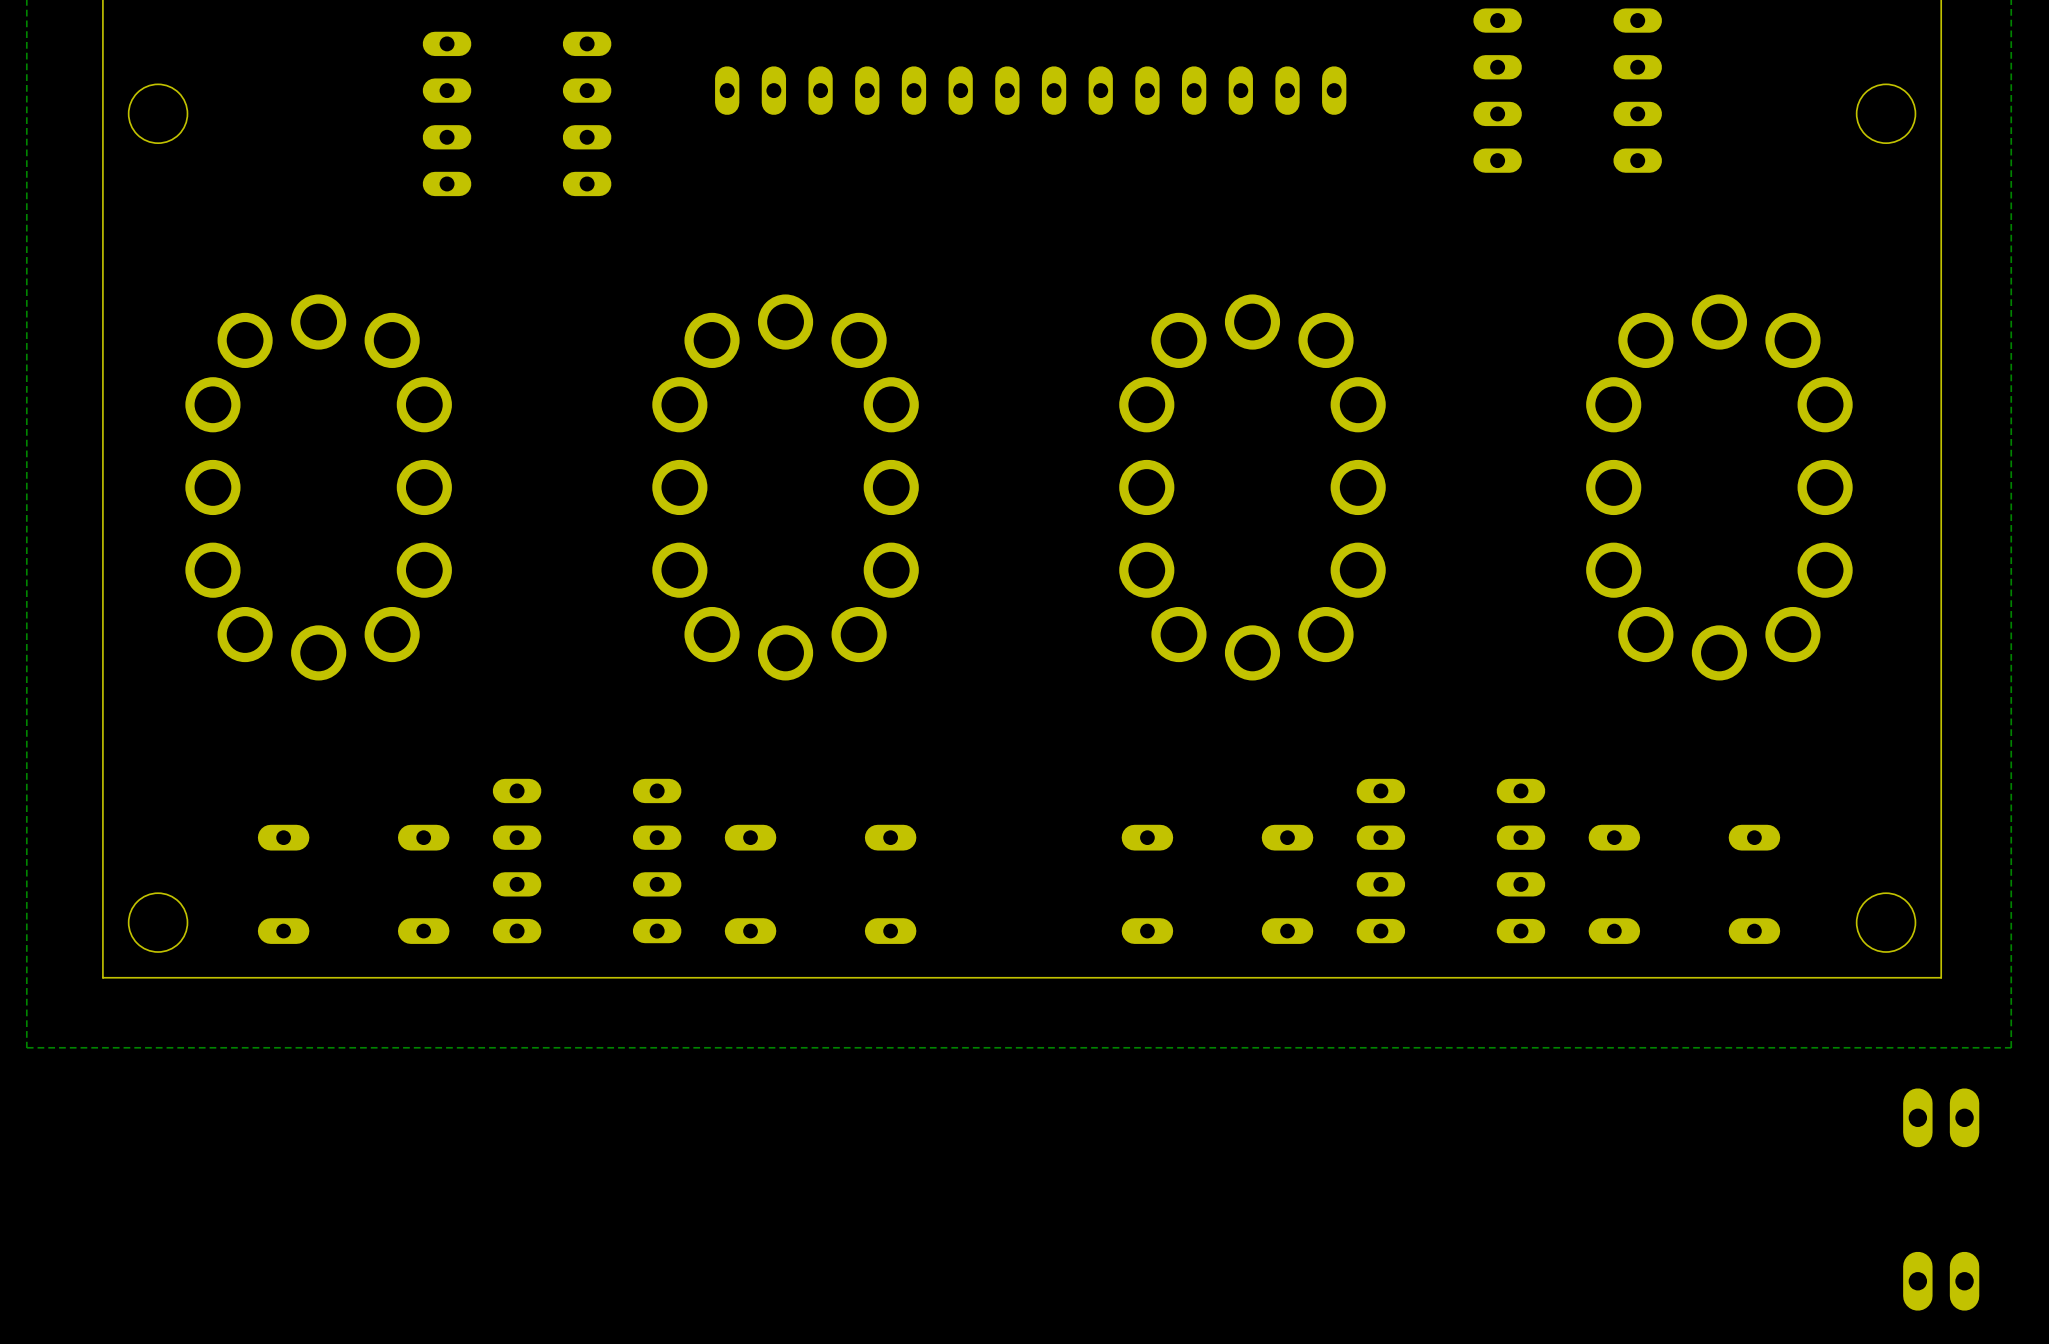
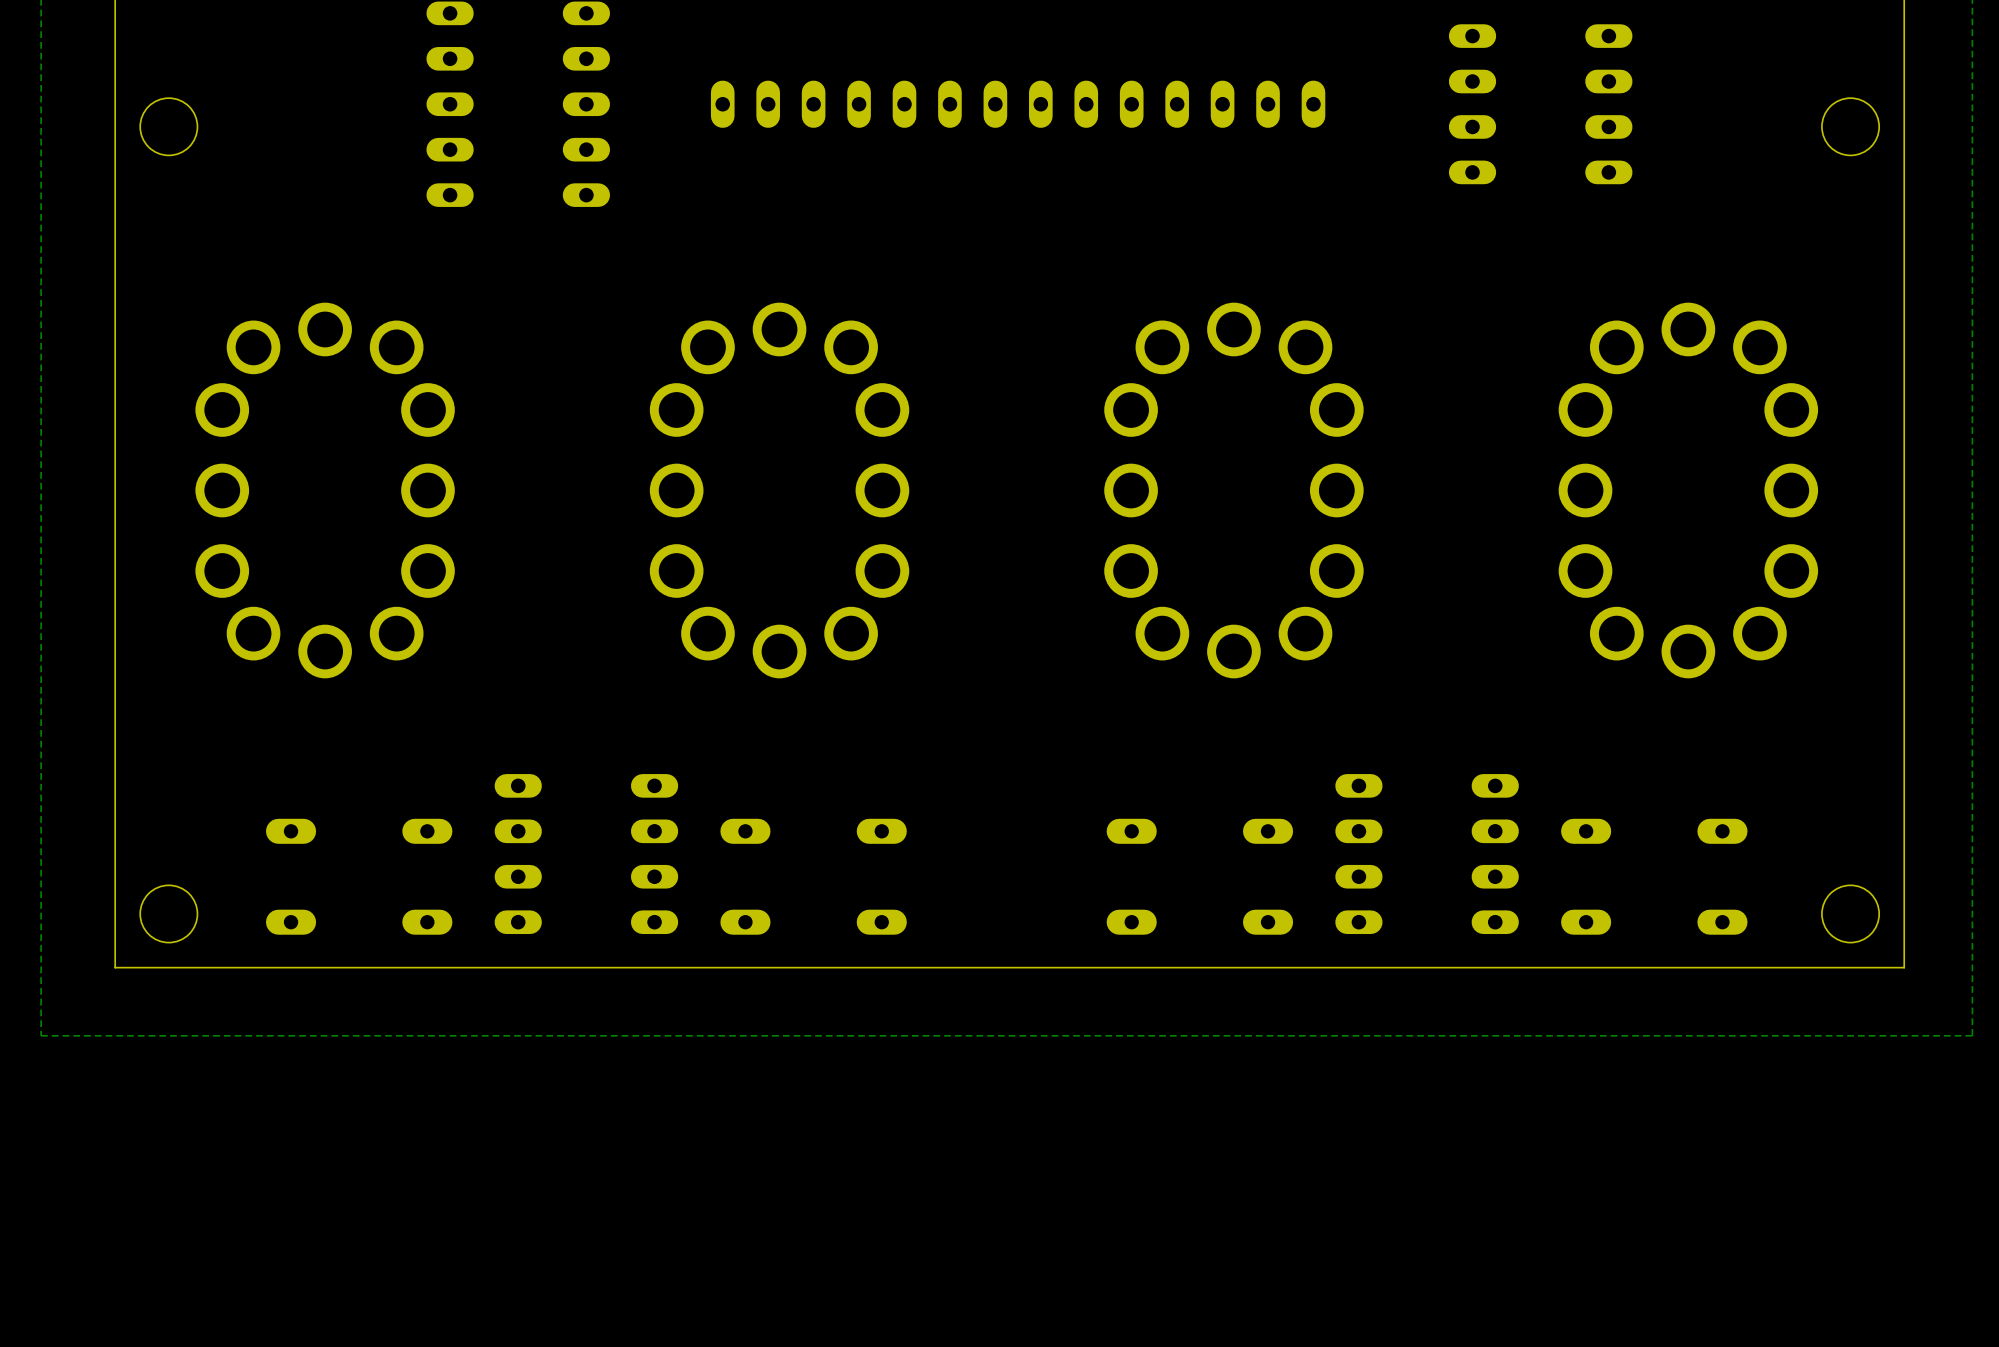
part: (1941, 1117) -> none
part: (1941, 1281) -> none

